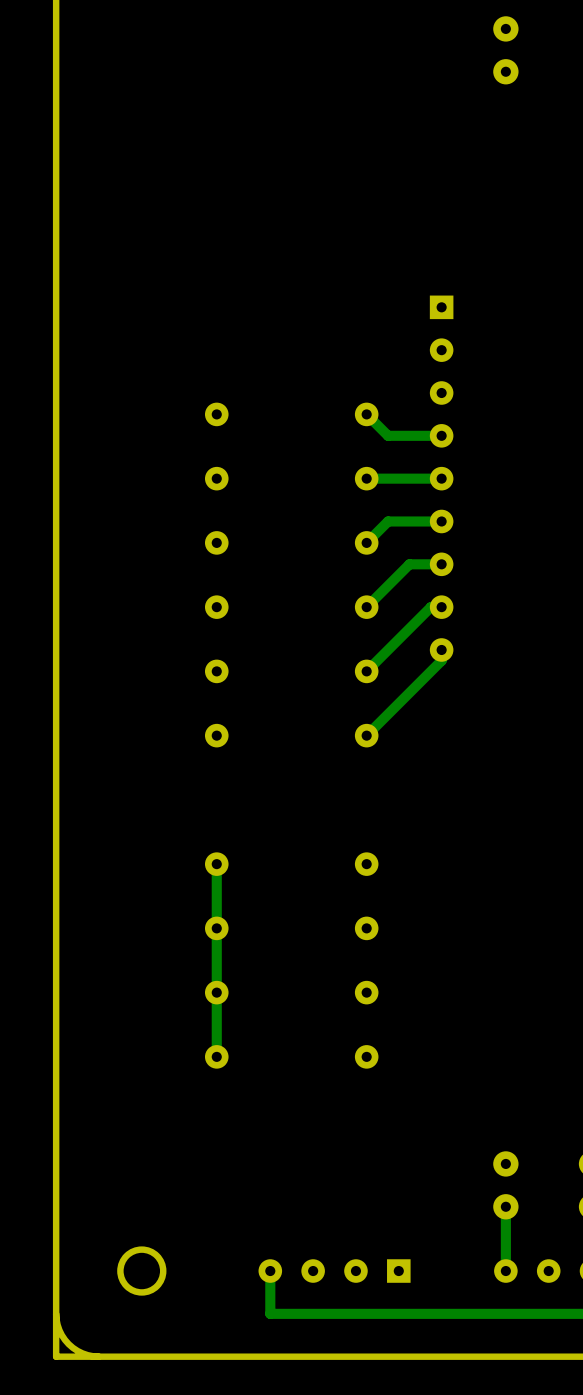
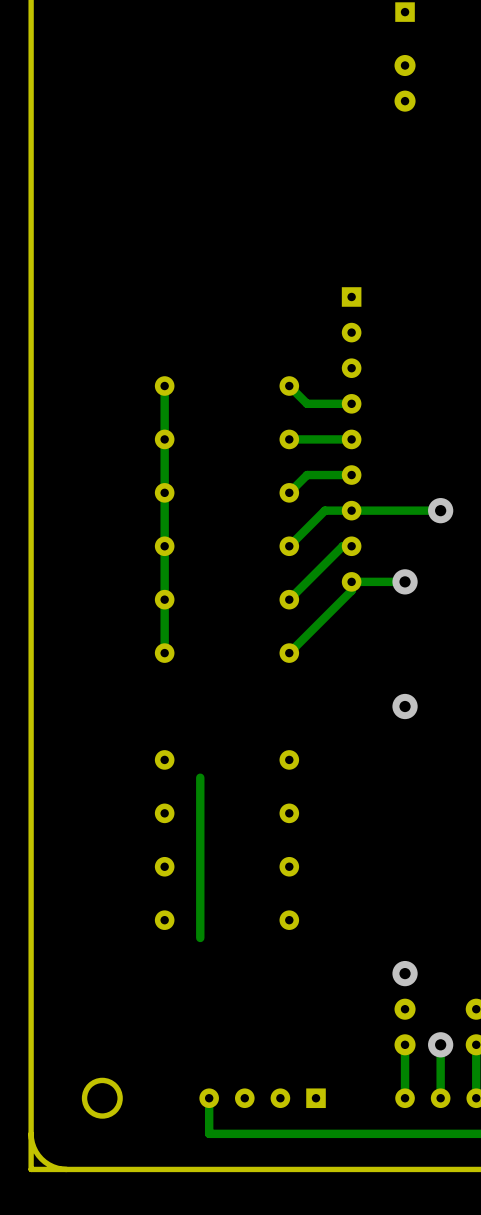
track: none -> (164, 386) (164, 653)
track: none -> (440, 510) (351, 510)
via: none -> (440, 510)
track: none -> (405, 581) (351, 581)
via: none -> (405, 581)
via: none -> (405, 706)
track: (216, 864) (216, 1056) -> (200, 777) (200, 937)
via: none -> (405, 973)
track: none -> (440, 1044) (440, 1098)
via: none -> (440, 1044)

